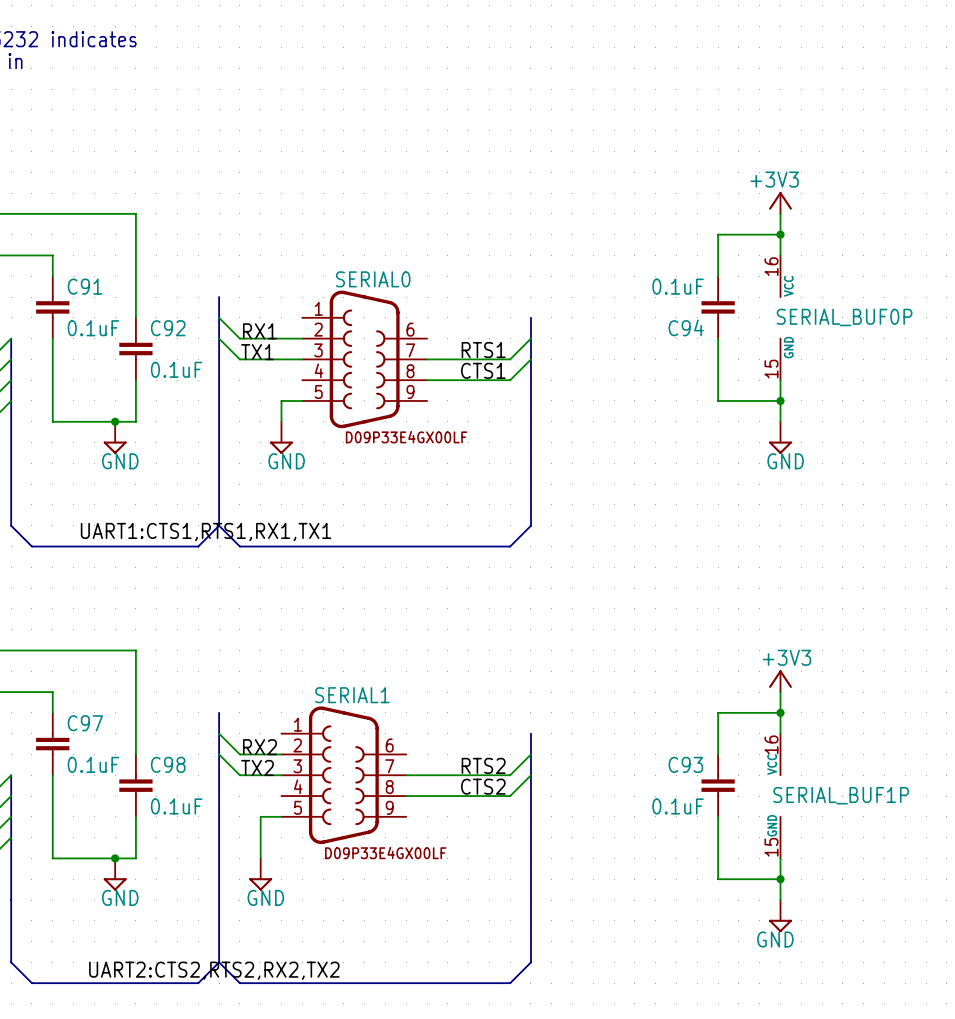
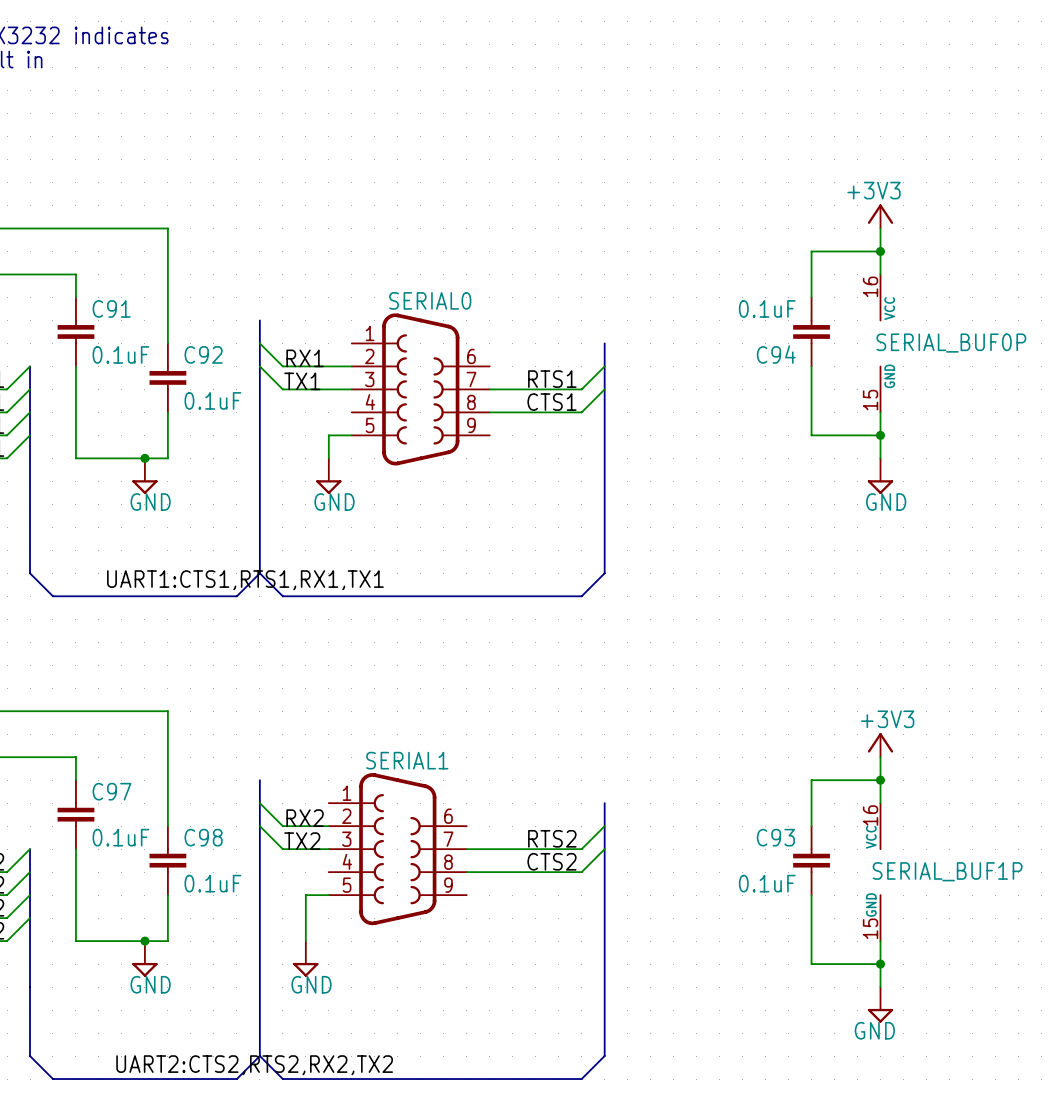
text: D09P33E4GX00LF (406, 437) -> none
text: D09P33E4GX00LF (385, 852) -> none

